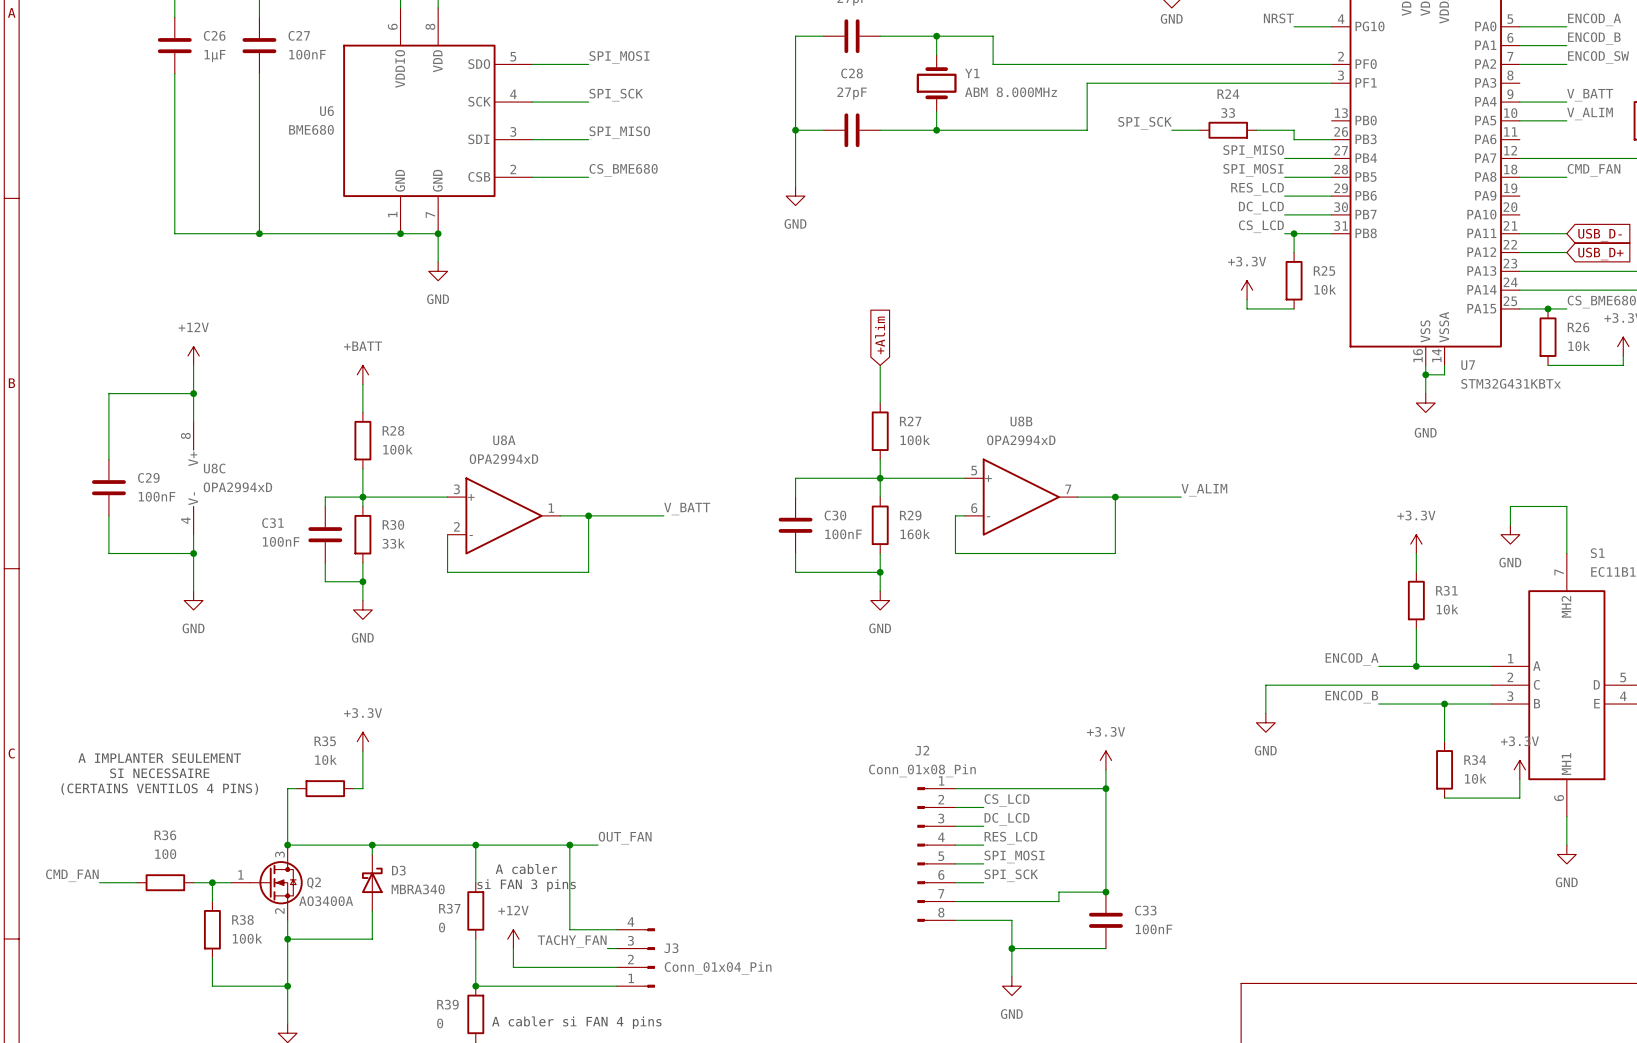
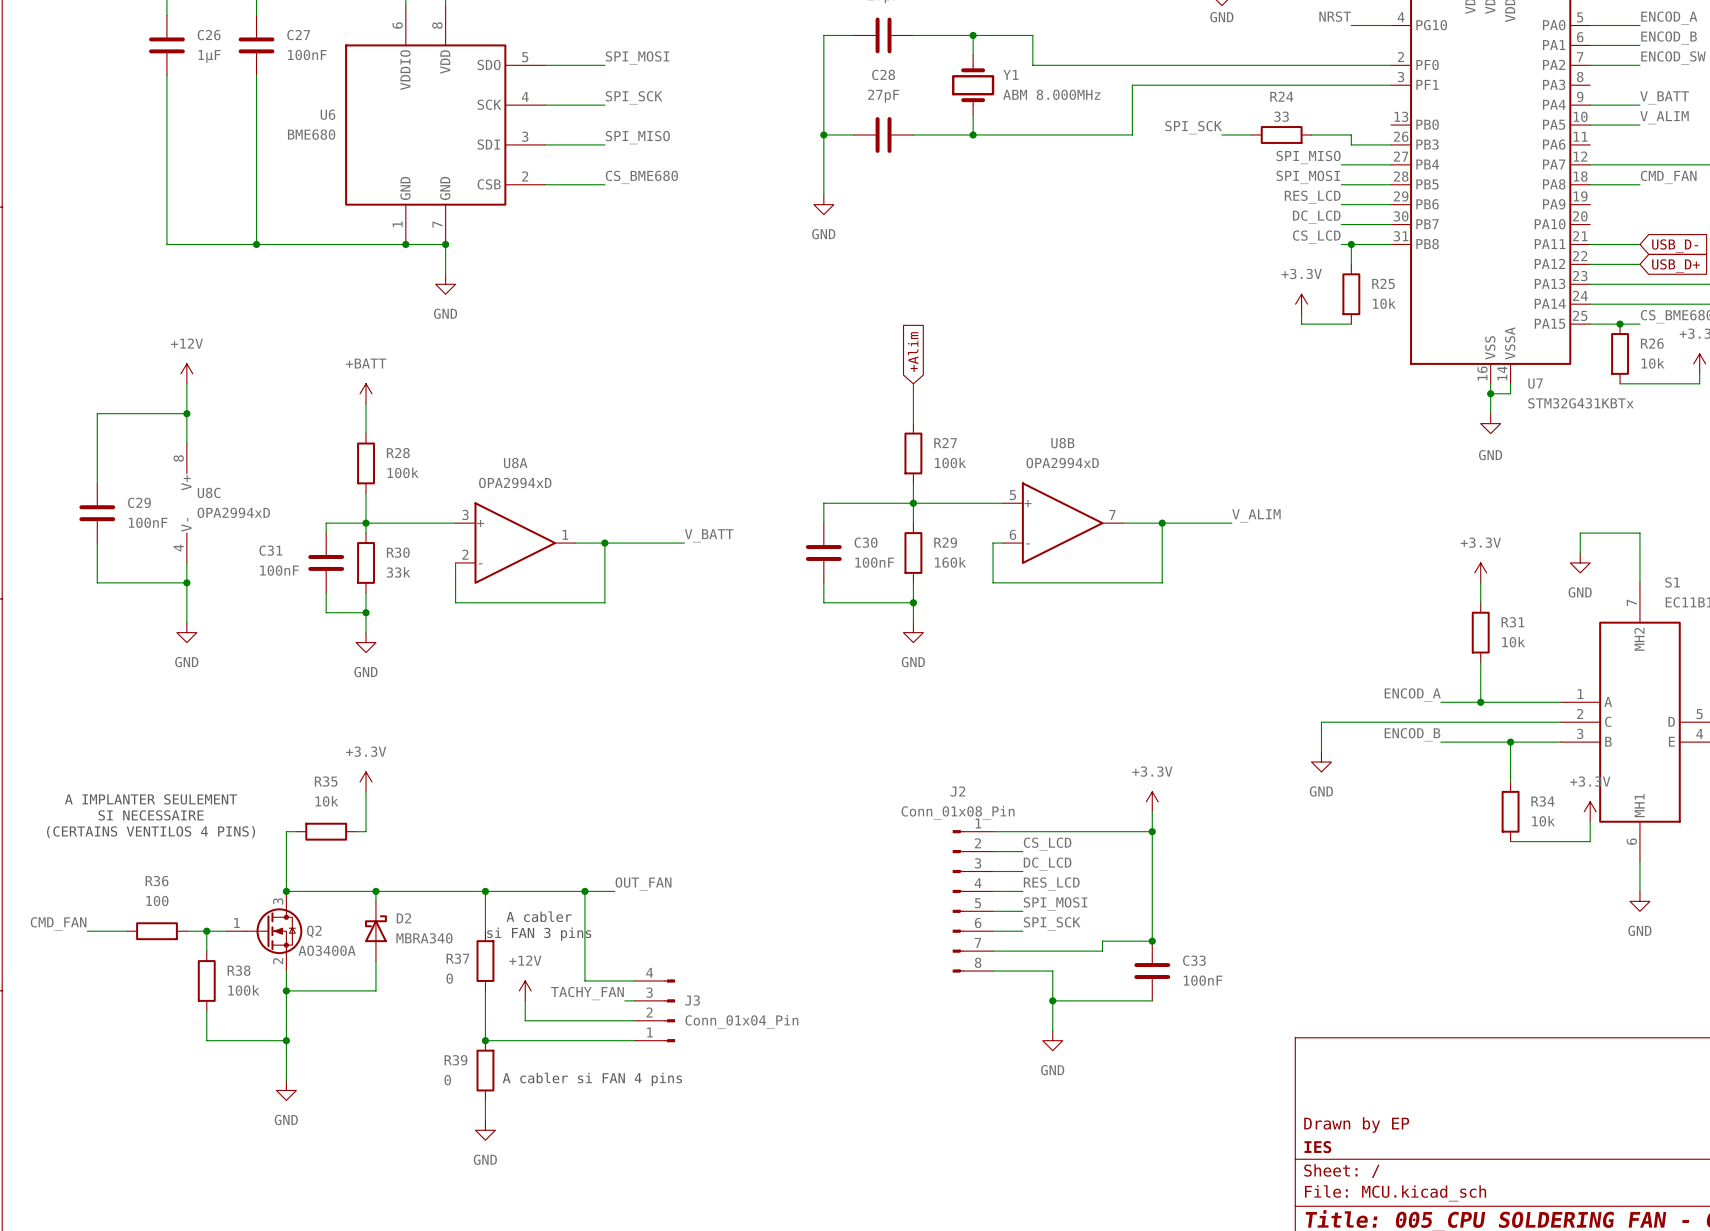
D3 name: D3 (398, 870) -> D2 (403, 918)

